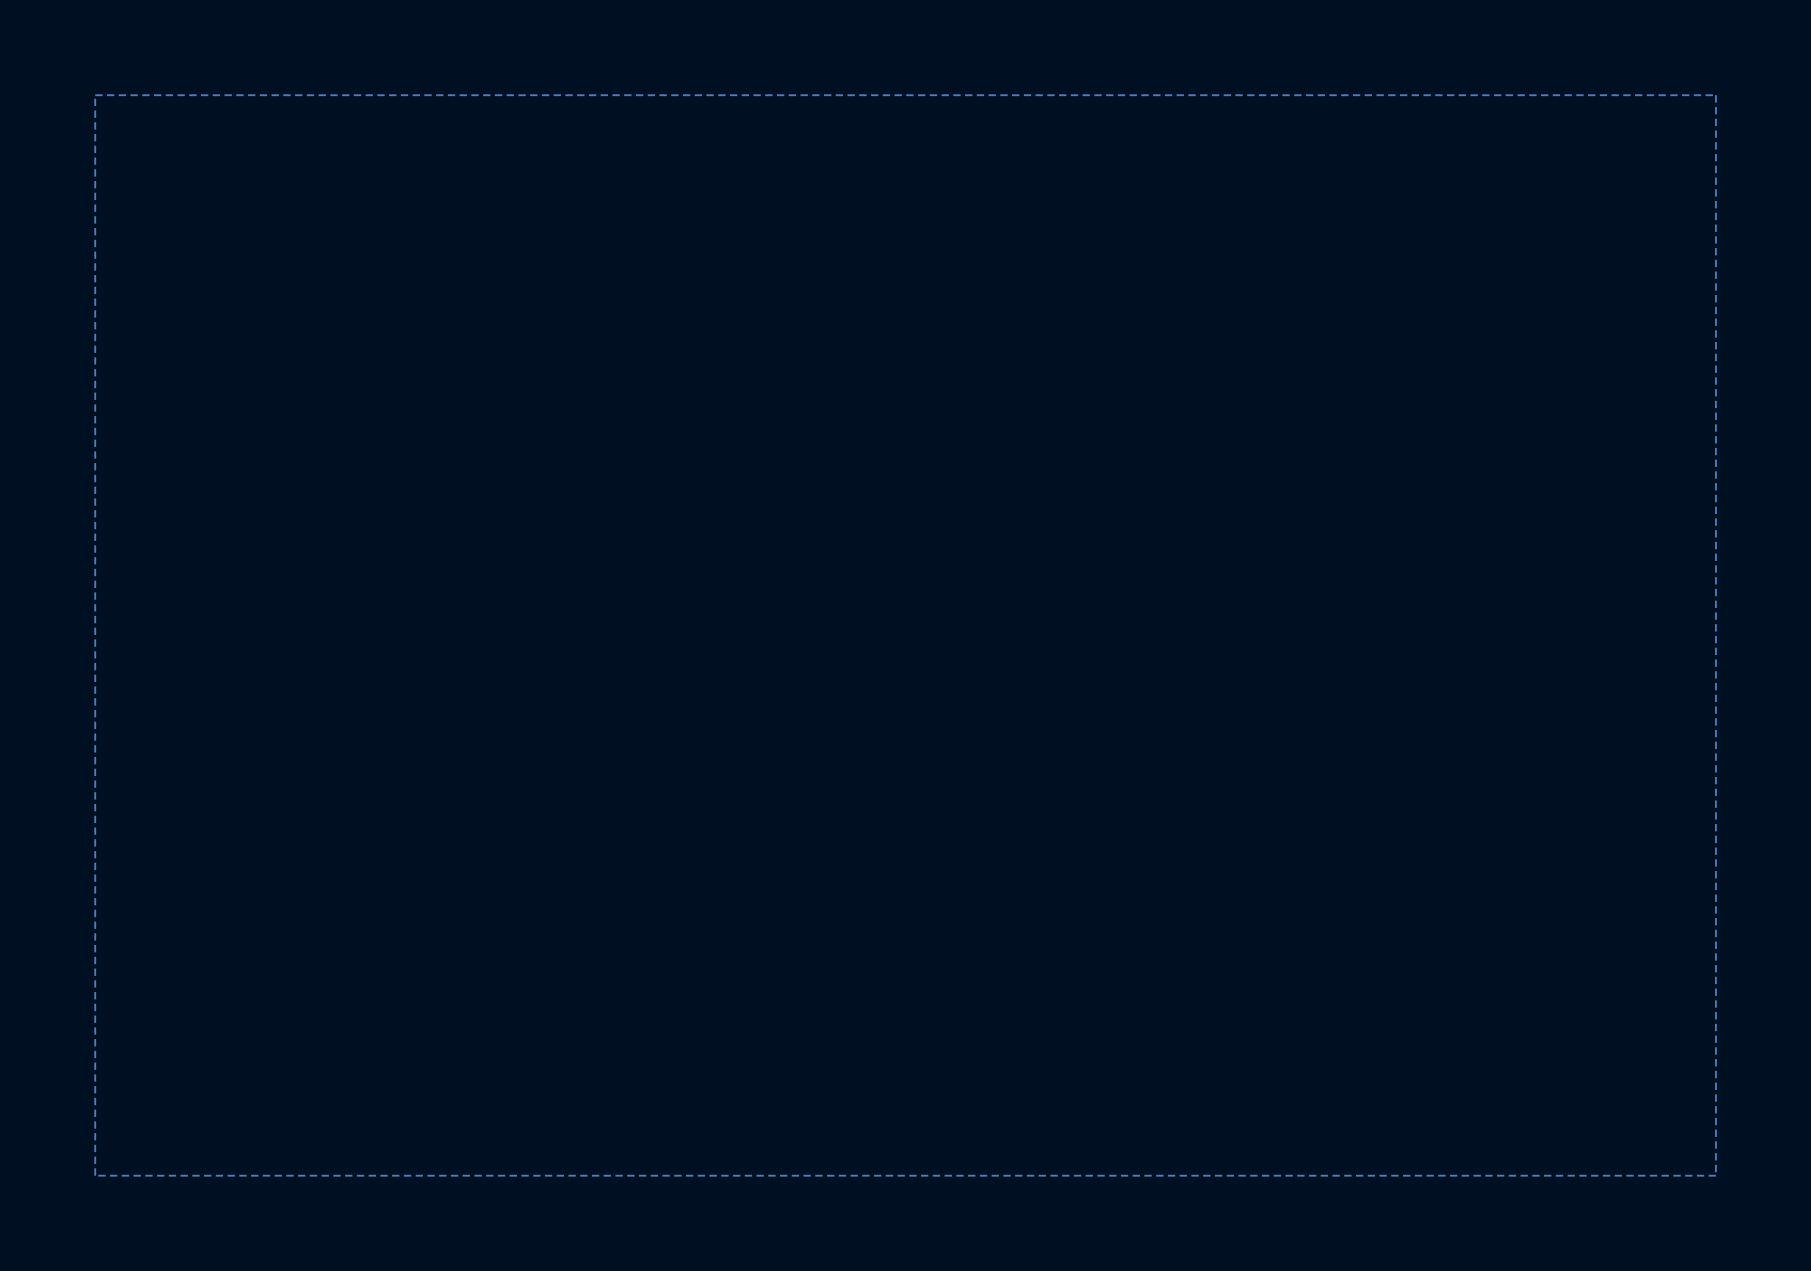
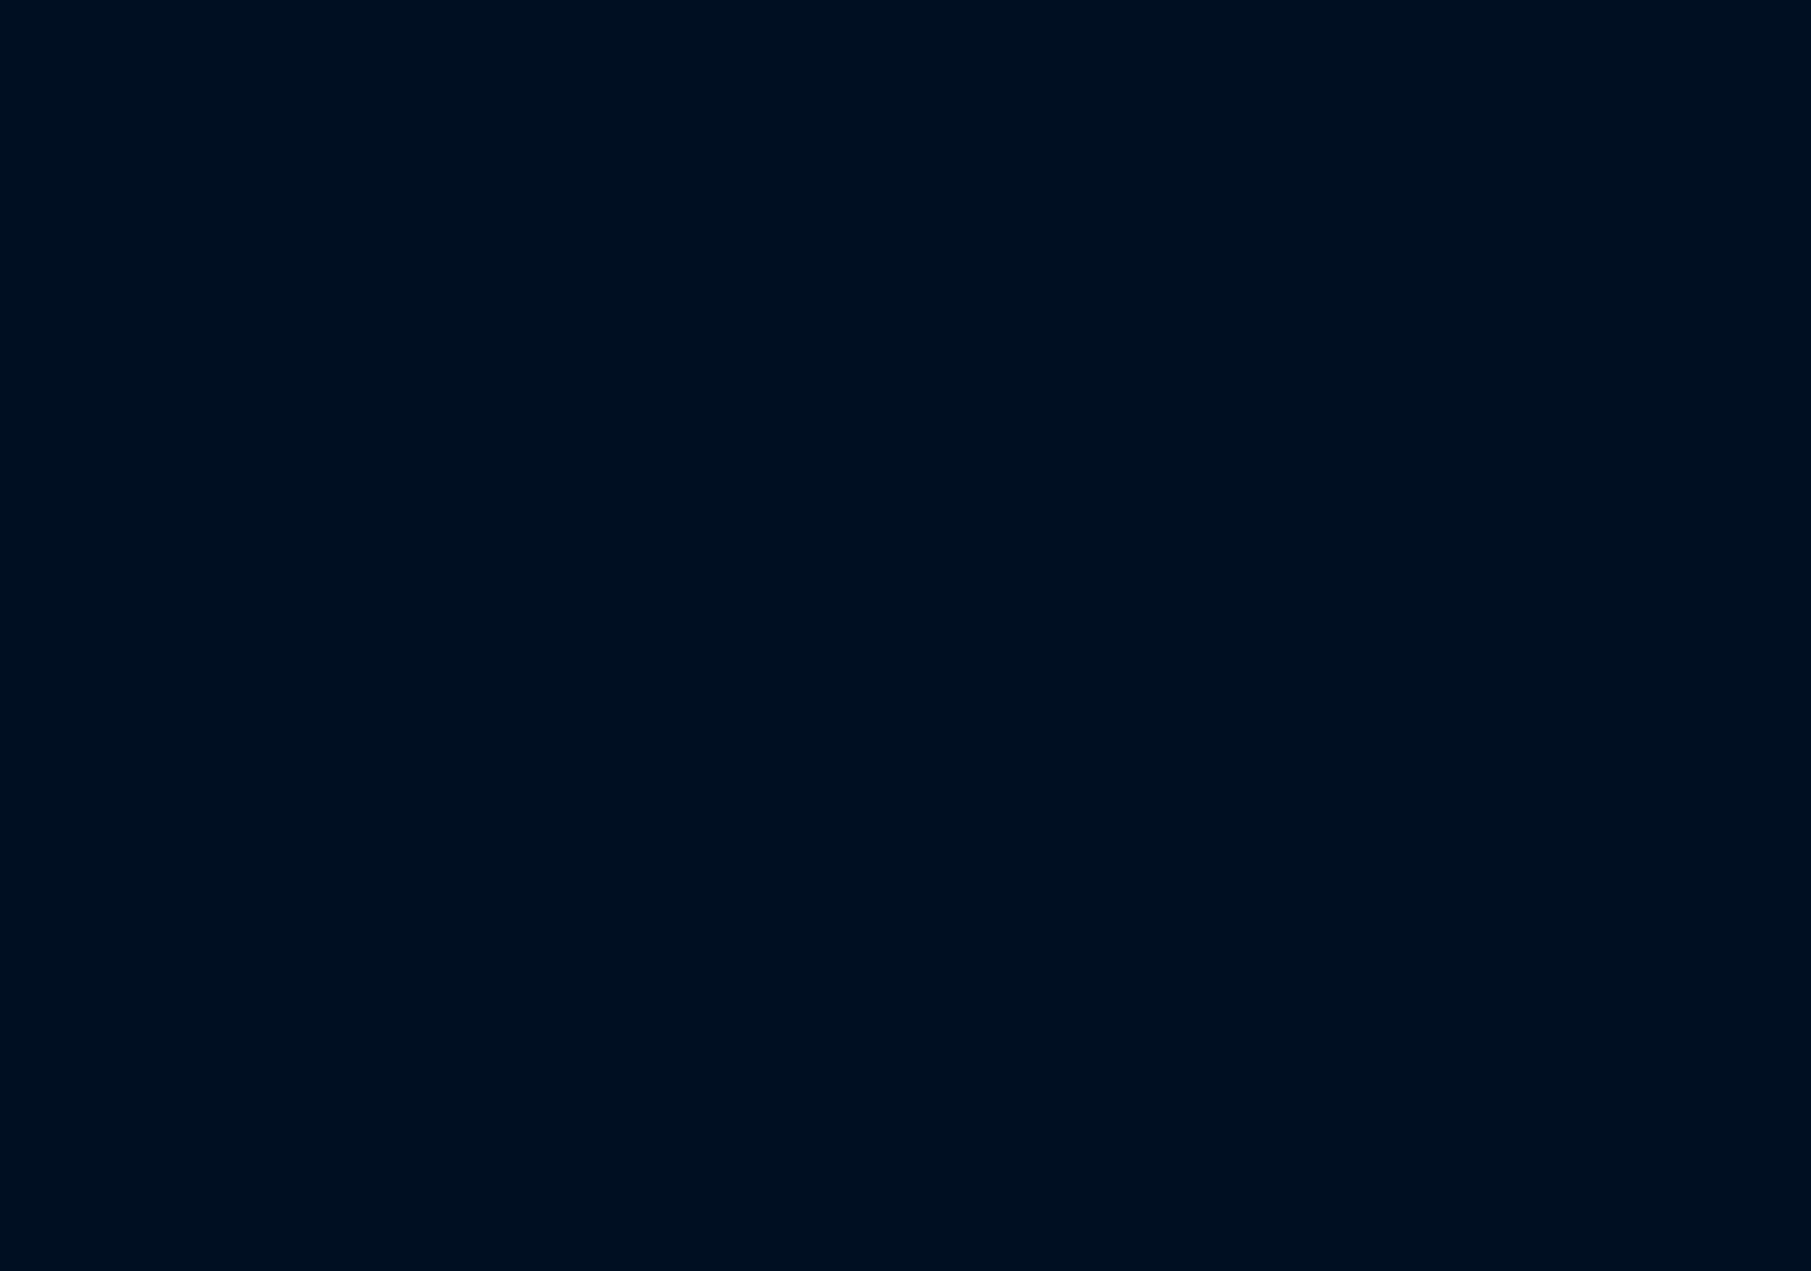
bottom zone outline: (95, 95) (1715, 95) (1715, 1175) (95, 1175) (95, 95) -> none

